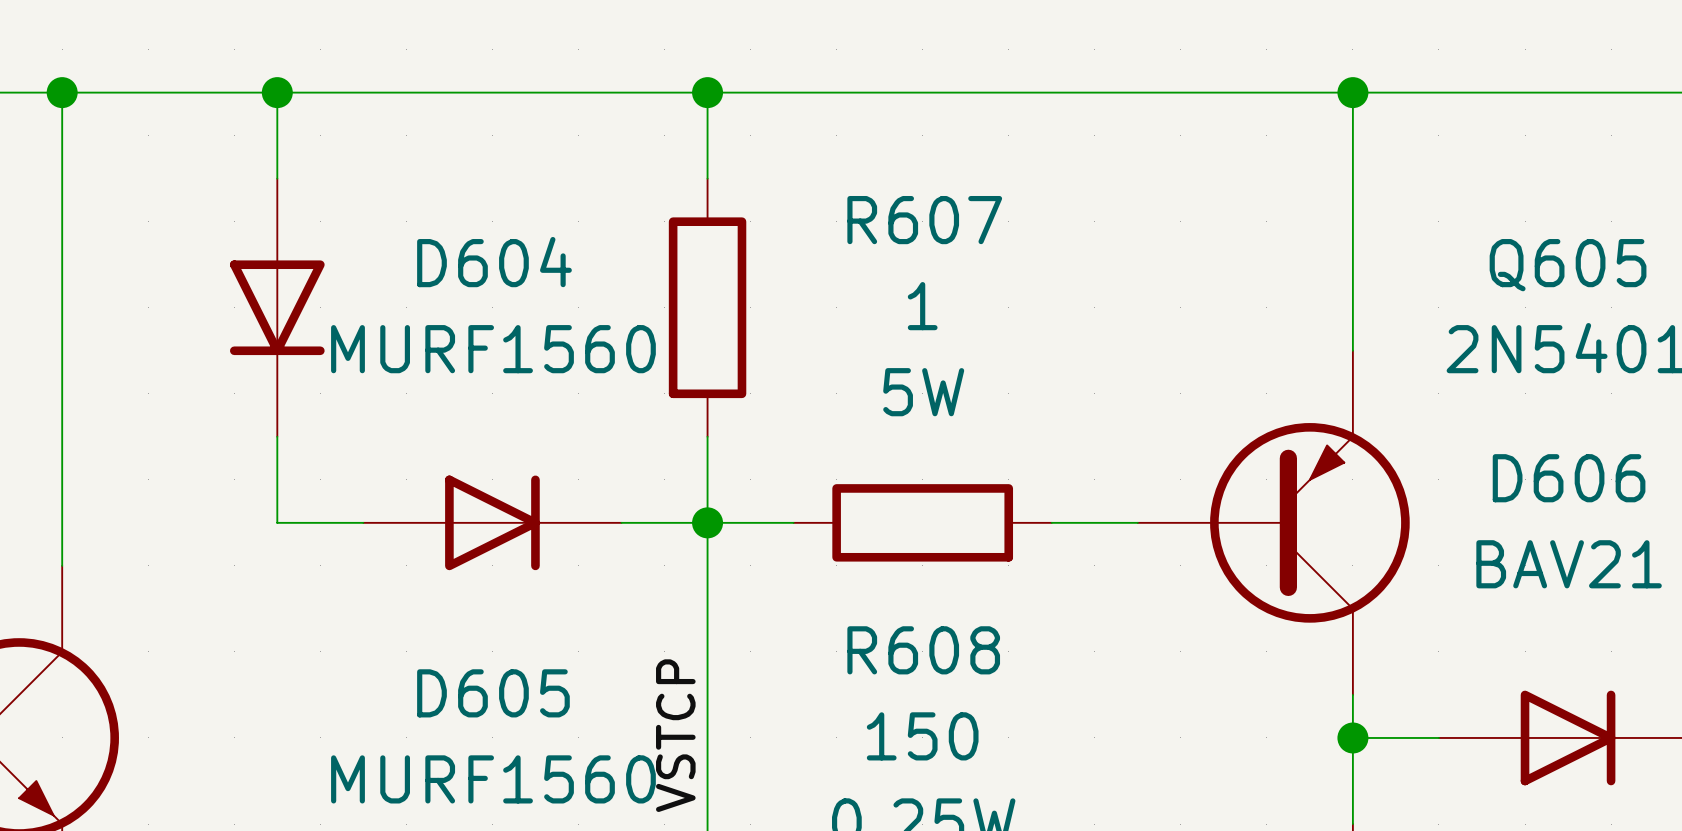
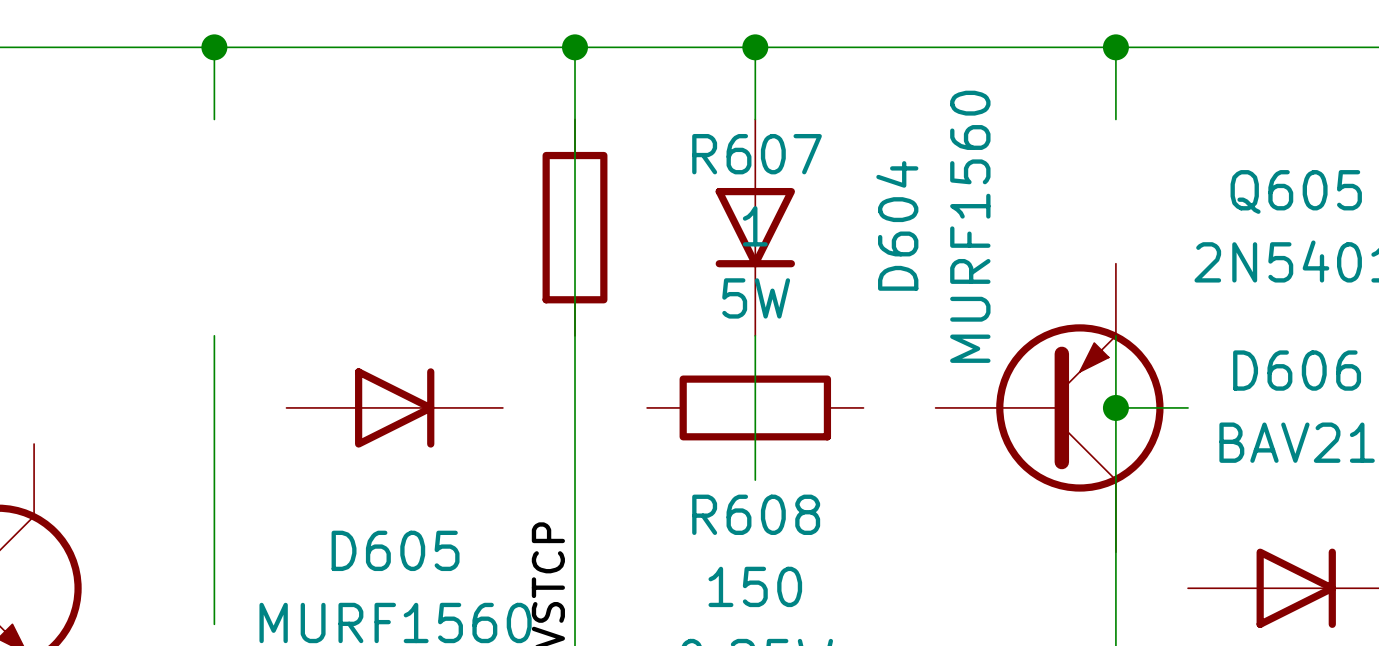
wire: (62, 92) (62, 565) -> none
junction: (62, 92) -> none
wire: none -> (755, 47) (755, 119)
junction: none -> (755, 47)
wire: none -> (575, 119) (575, 335)
wire: (1352, 178) (1352, 350) -> (755, 335) (755, 480)
D604 name rotation: 0° (494, 262) -> 90° counterclockwise (897, 225)
D604 position: (277, 307) -> (755, 227)
D604 value rotation: 0° (493, 349) -> 90° counterclockwise (970, 226)
wire: none -> (1115, 335) (1115, 552)
wire: (277, 522) (363, 522) -> (214, 407) (214, 624)
wire: (621, 522) (793, 522) -> none
junction: (707, 522) -> none
wire: (1051, 522) (1137, 522) -> none
junction: none -> (1115, 407)
wire: (1352, 737) (1438, 737) -> (1115, 407) (1188, 407)
junction: (1352, 737) -> none

